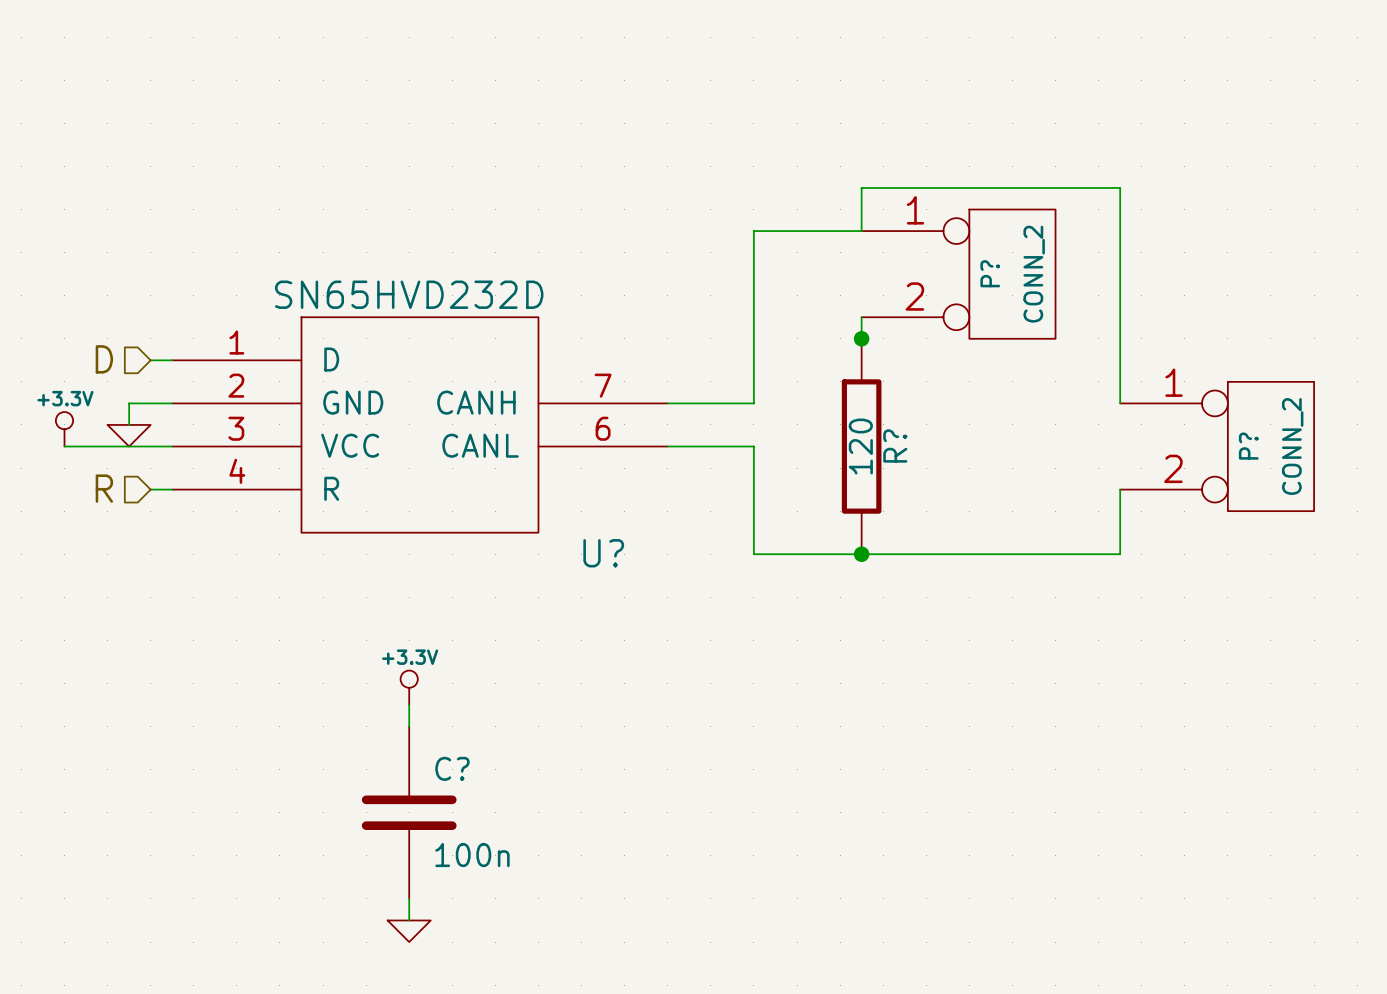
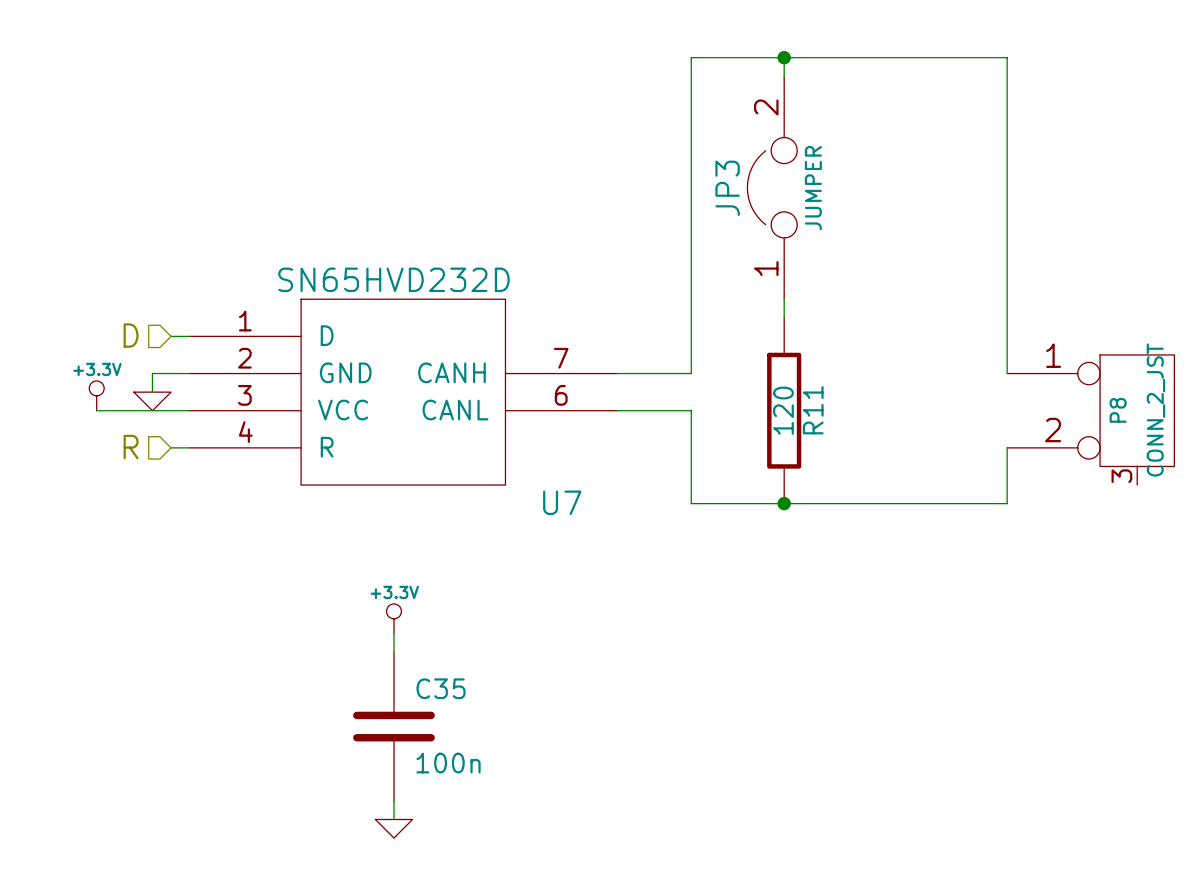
wire: none -> (784, 57) (784, 76)
junction: none -> (784, 57)
JP3: none -> JUMPER (772, 187)
wire: (1120, 187) (861, 187) (861, 231) (753, 231) -> (1007, 187) (1007, 57) (691, 57) (691, 224)
P?: CONN_2 (958, 274) -> none
junction: (861, 338) -> none
R? name: R? (895, 445) -> R11 (813, 410)
P?: CONN_2 (1217, 446) -> none
P8: none -> CONN_2_JST (1090, 420)
U? name: U? (603, 553) -> U7 (562, 502)
C? name: C? (452, 768) -> C35 (441, 688)

